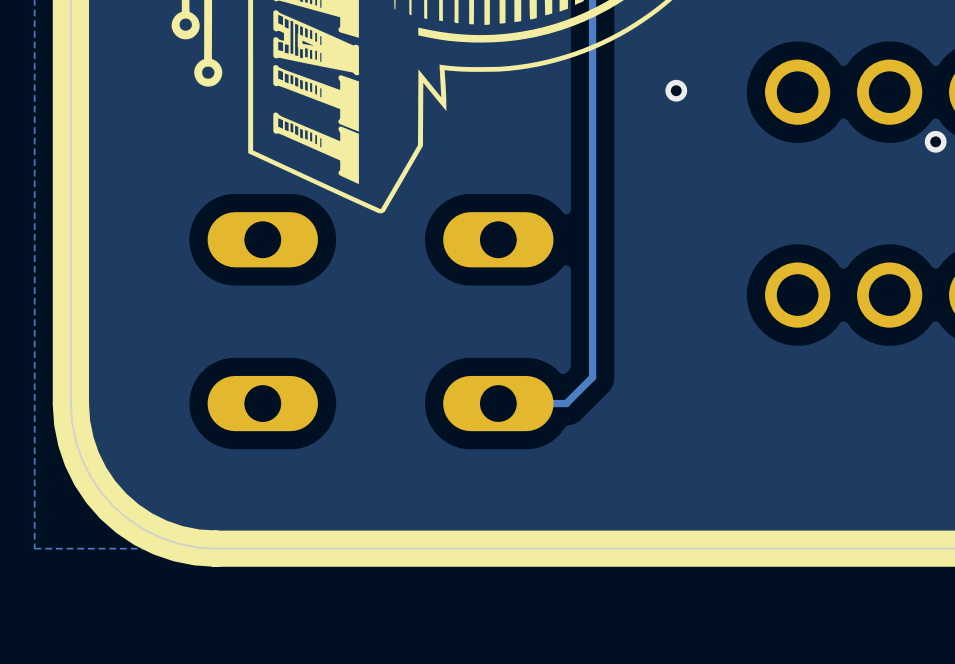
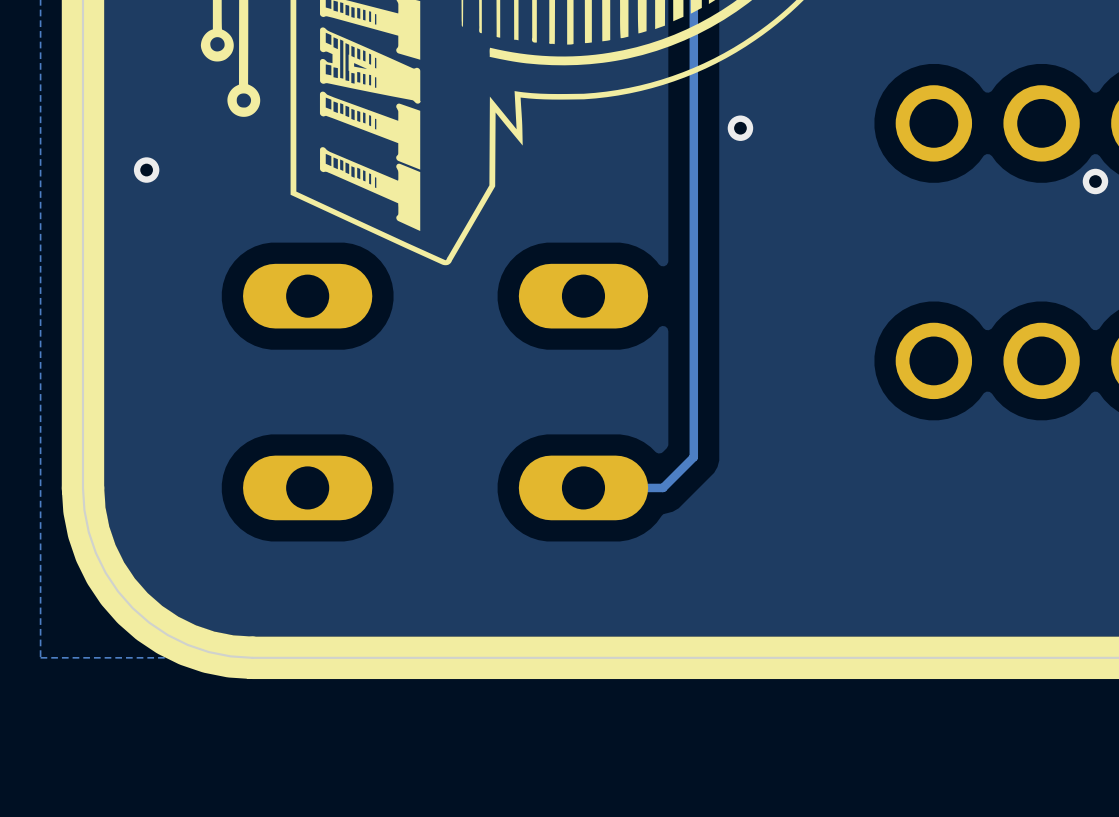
via position: (676, 90) -> (740, 128)
via: none -> (146, 170)

